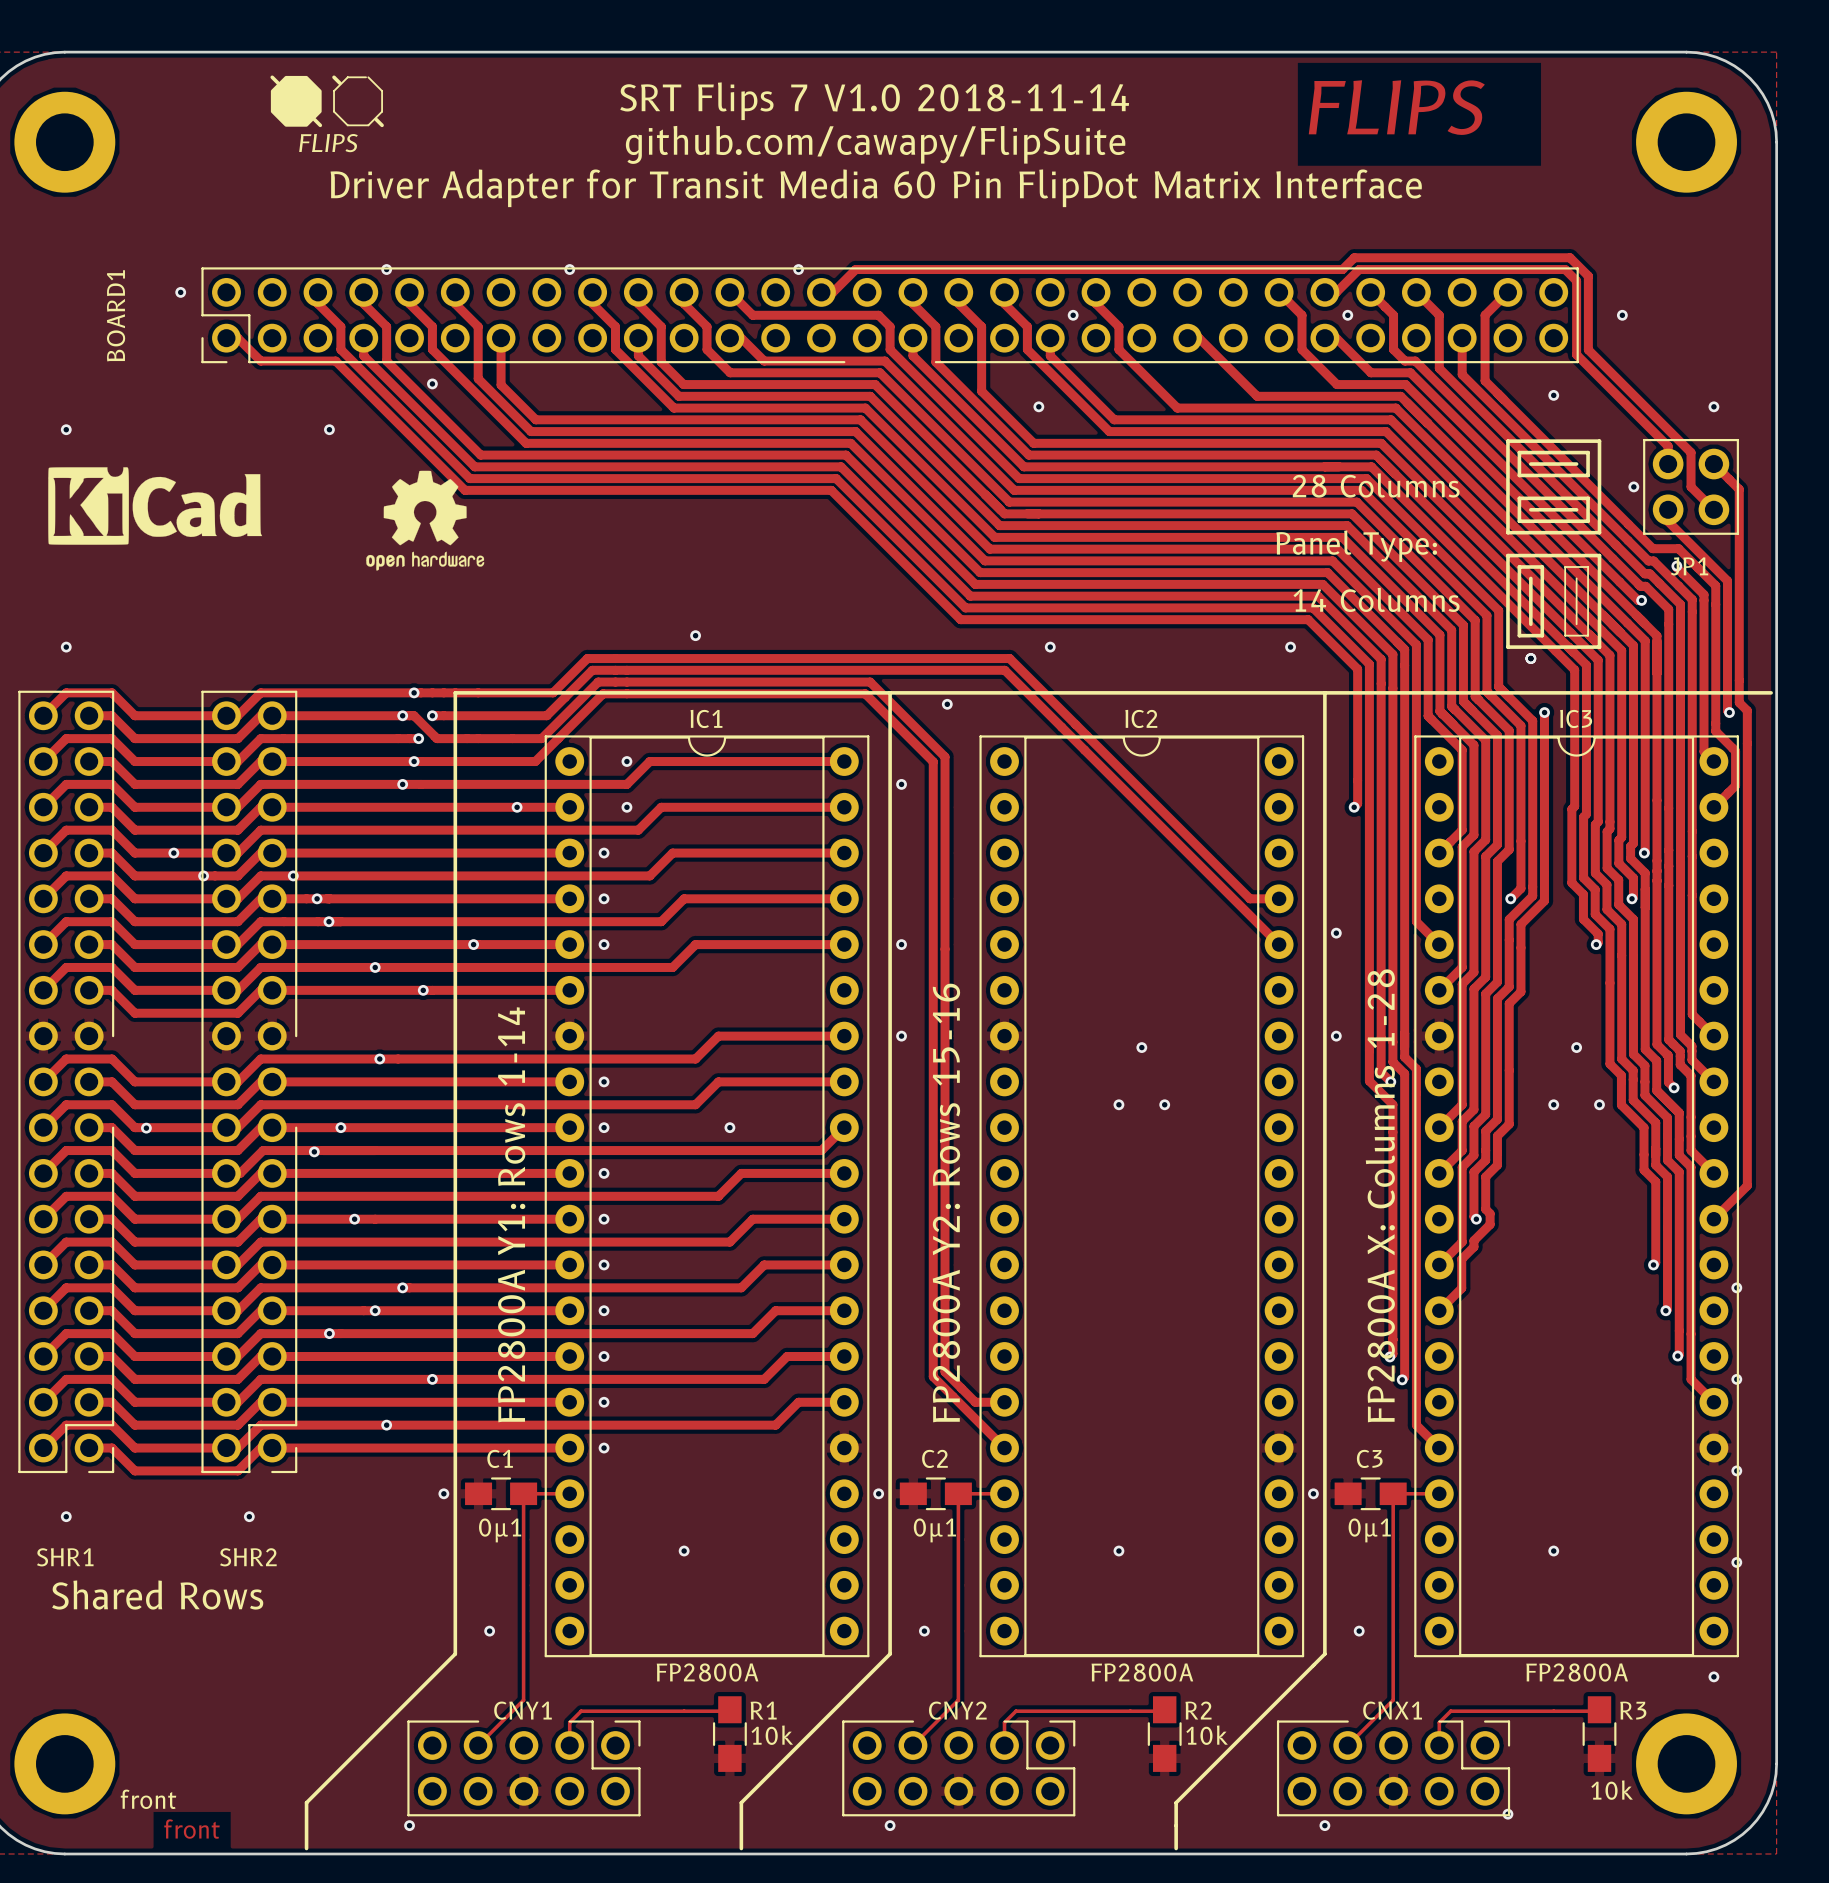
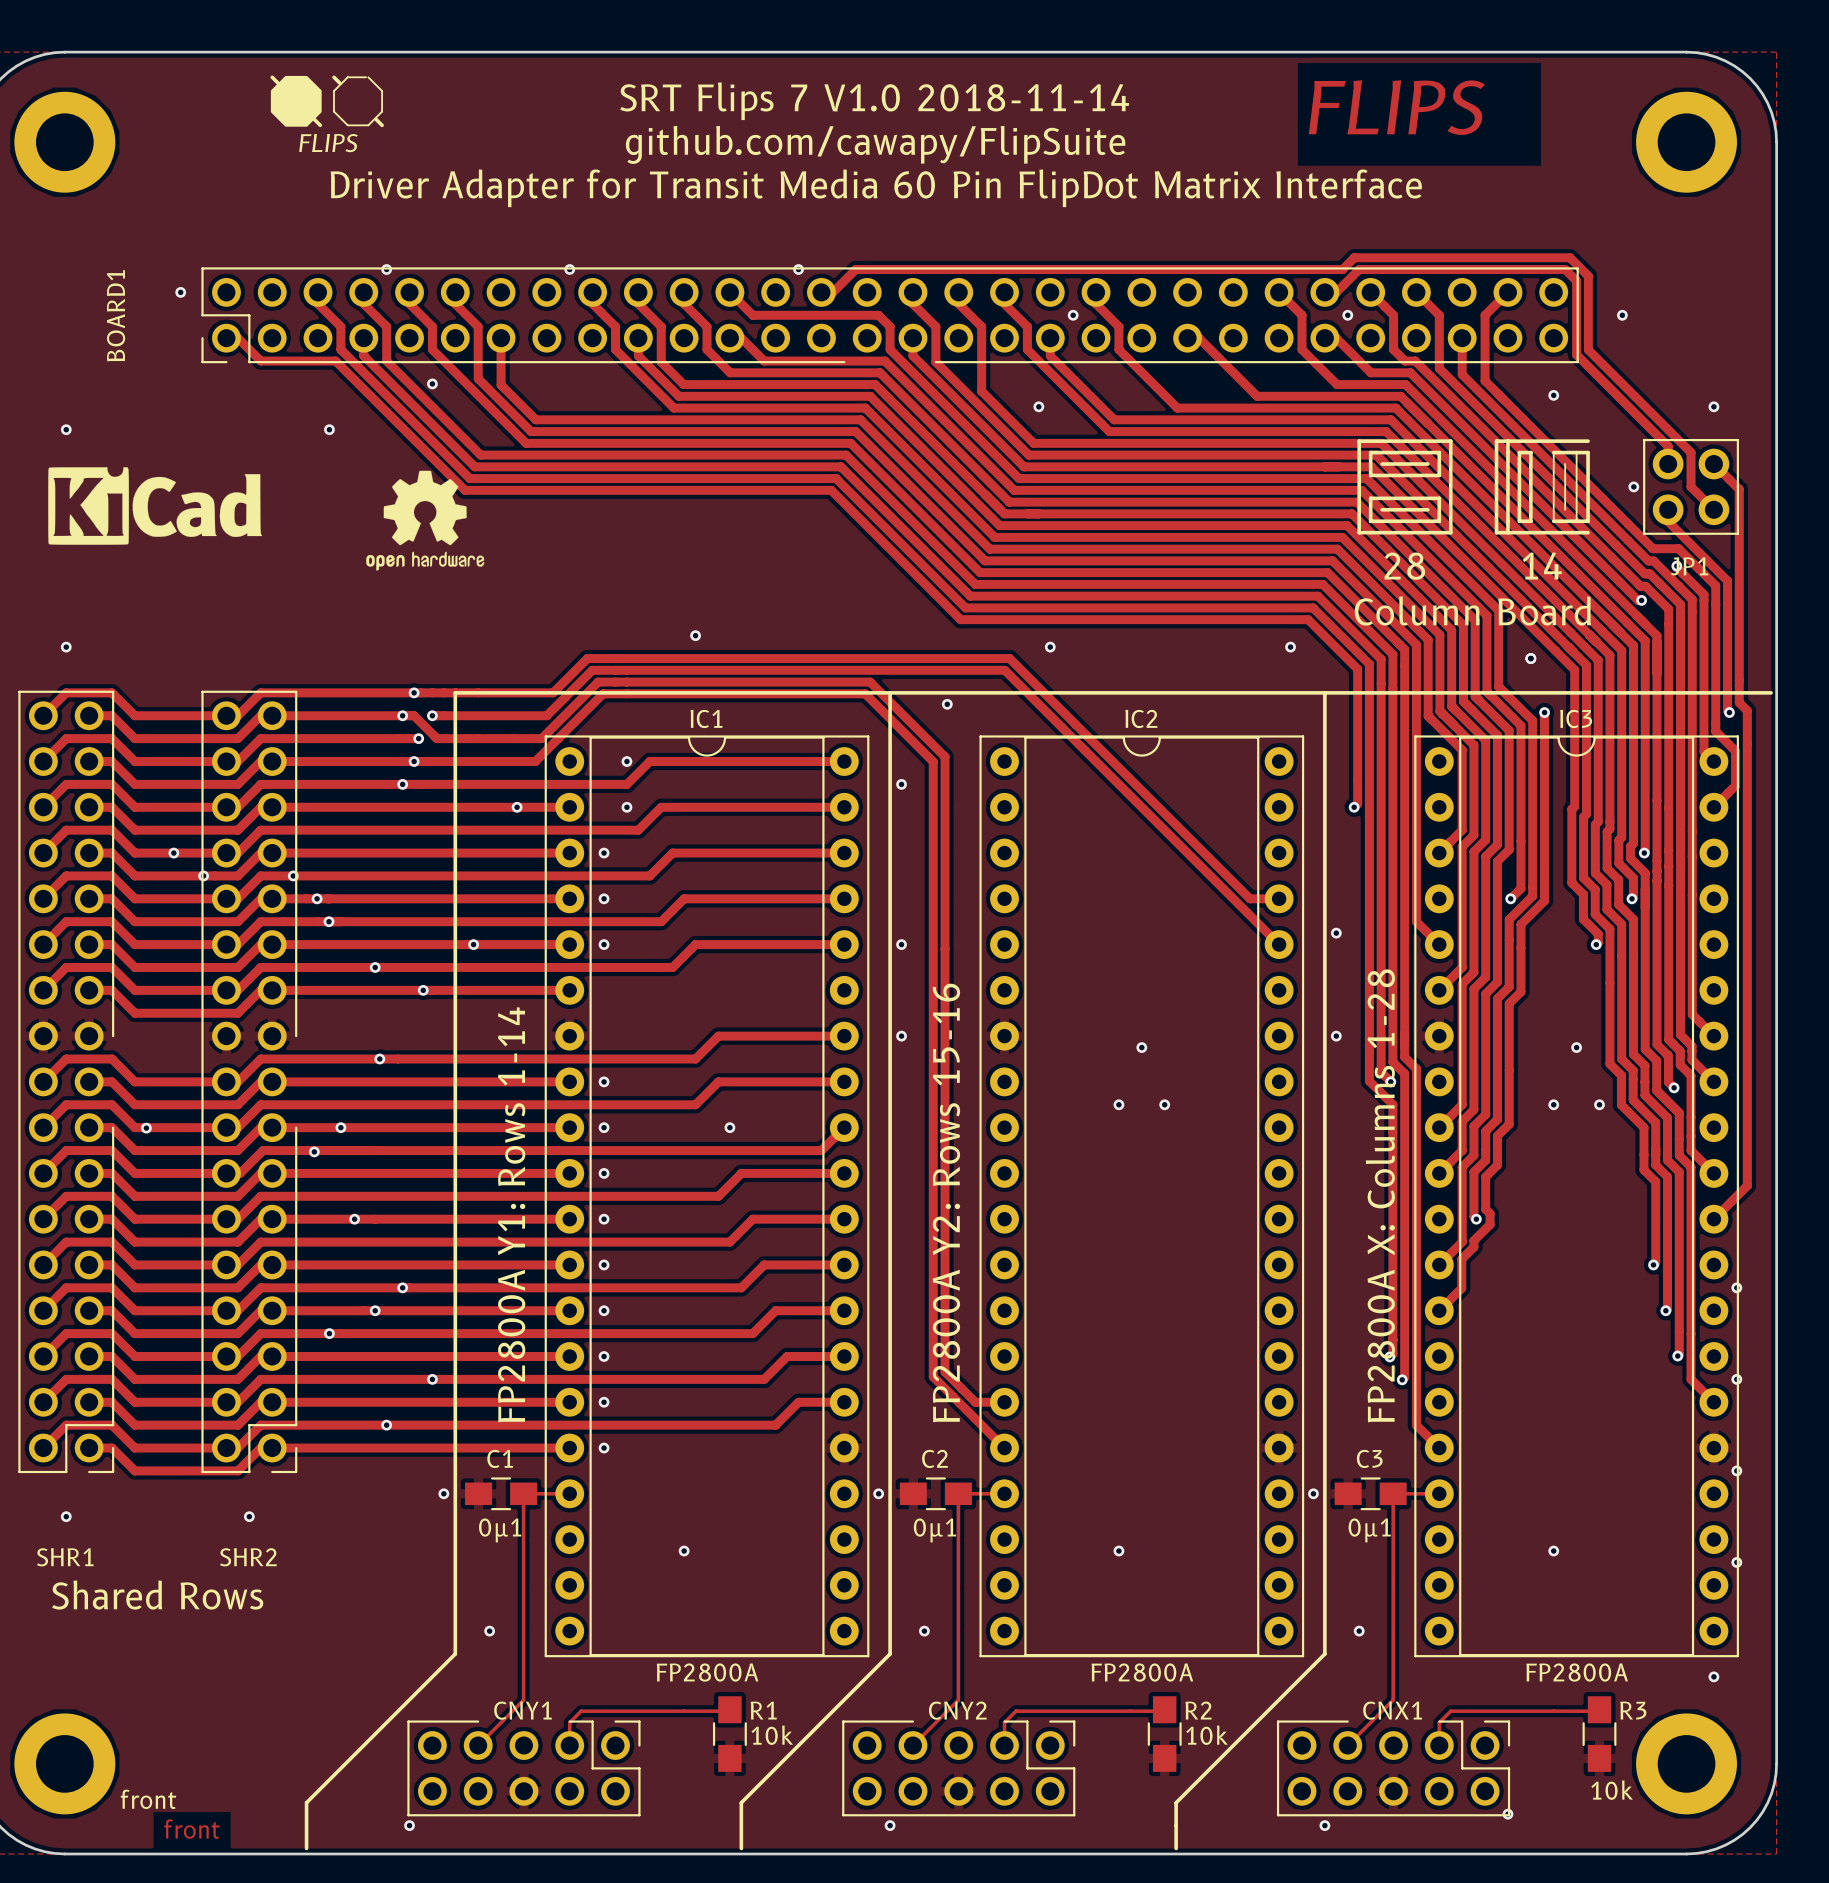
line: none -> (1507, 441) (1496, 441) (1496, 532) (1507, 532)
line: (1588, 441) (1599, 441) (1599, 532) (1588, 532) -> none
line: none -> (1370, 452) (1370, 475) (1439, 475) (1439, 452) (1370, 452)
line: (1530, 452) (1553, 452) -> (1530, 452) (1530, 521)
line: none -> (1576, 452) (1576, 521)
line: (1530, 464) (1576, 464) -> (1382, 464) (1427, 464)
line: (1519, 475) (1588, 475) -> (1519, 475) (1519, 498)
text: 28 Columns (1376, 485) -> none
line: none -> (1370, 498) (1370, 521) (1439, 521) (1439, 498) (1370, 498)
line: (1519, 498) (1588, 498) -> (1588, 475) (1588, 498)
line: (1530, 509) (1576, 509) -> (1382, 509) (1427, 509)
line: (1530, 521) (1553, 521) -> (1553, 452) (1553, 521)
text: Panel Type: (1356, 546) -> none
line: (1507, 555) (1507, 647) (1599, 647) (1599, 555) (1507, 555) -> (1359, 441) (1359, 532) (1450, 532) (1450, 441) (1359, 441)
text: none -> 14 (1542, 565)
text: none -> 28 (1404, 566)
line: (1519, 567) (1519, 635) (1542, 635) (1542, 567) (1519, 567) -> none
line: (1565, 567) (1588, 567) (1588, 635) (1565, 635) (1565, 567) -> none
line: (1530, 578) (1530, 624) -> none
line: (1576, 578) (1576, 624) -> (1565, 464) (1565, 509)
text: 14 Columns (1376, 599) -> none
text: none -> Column Board (1472, 611)

